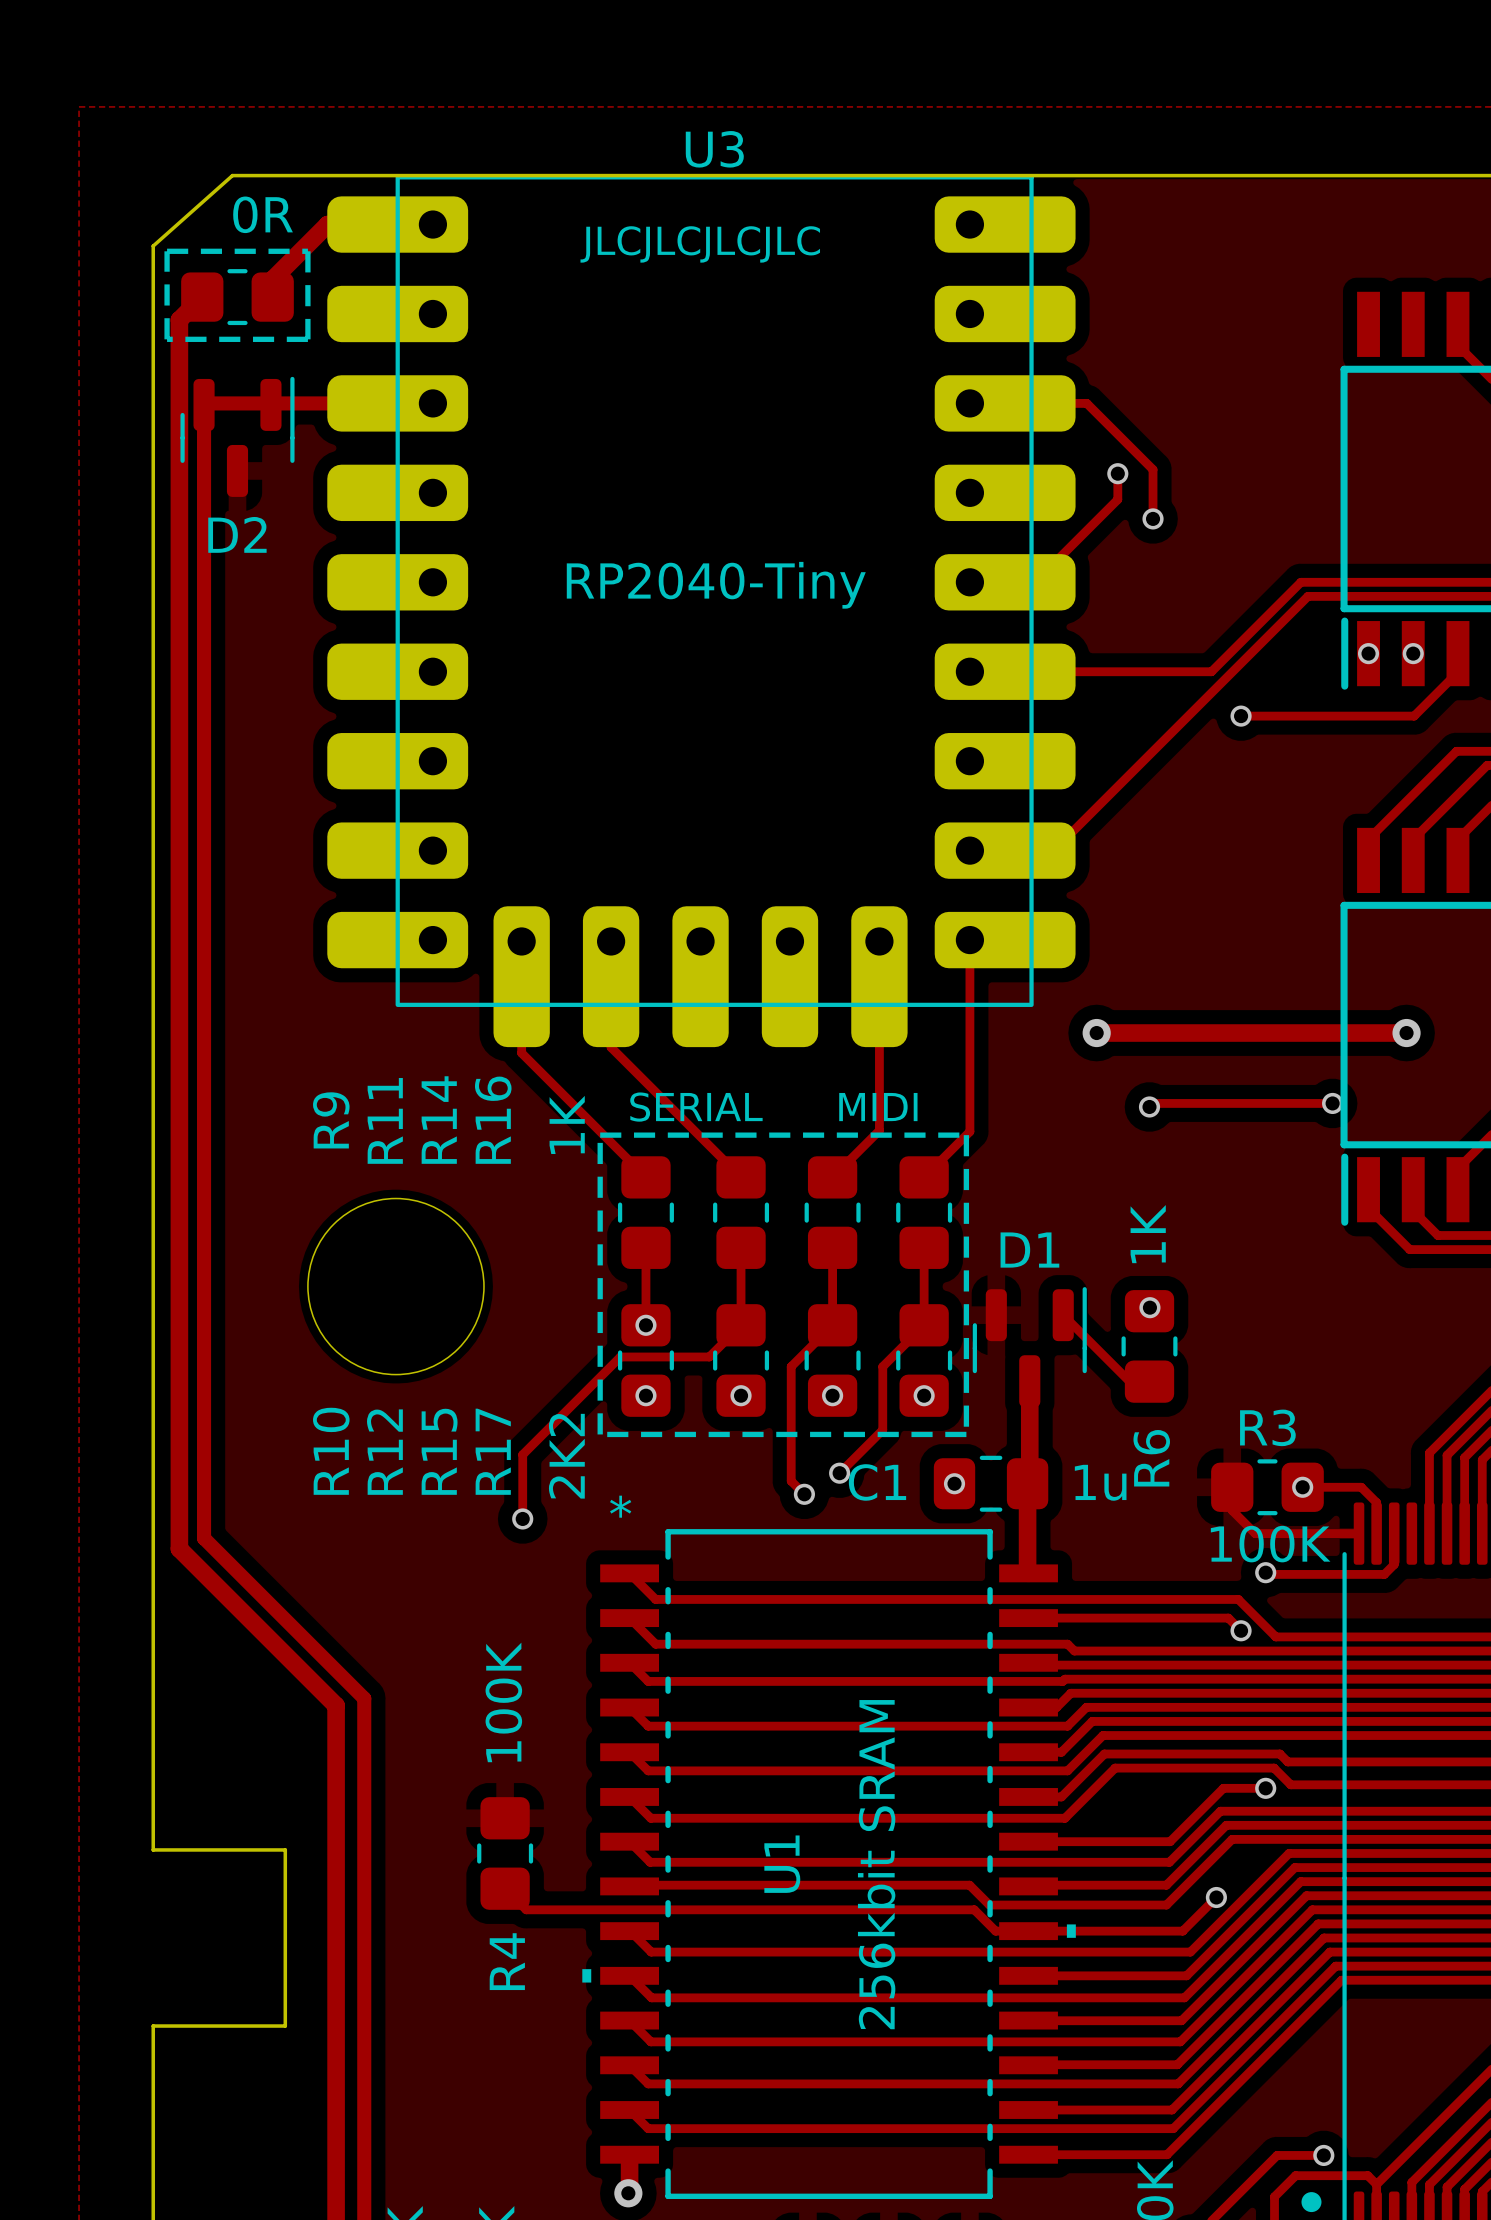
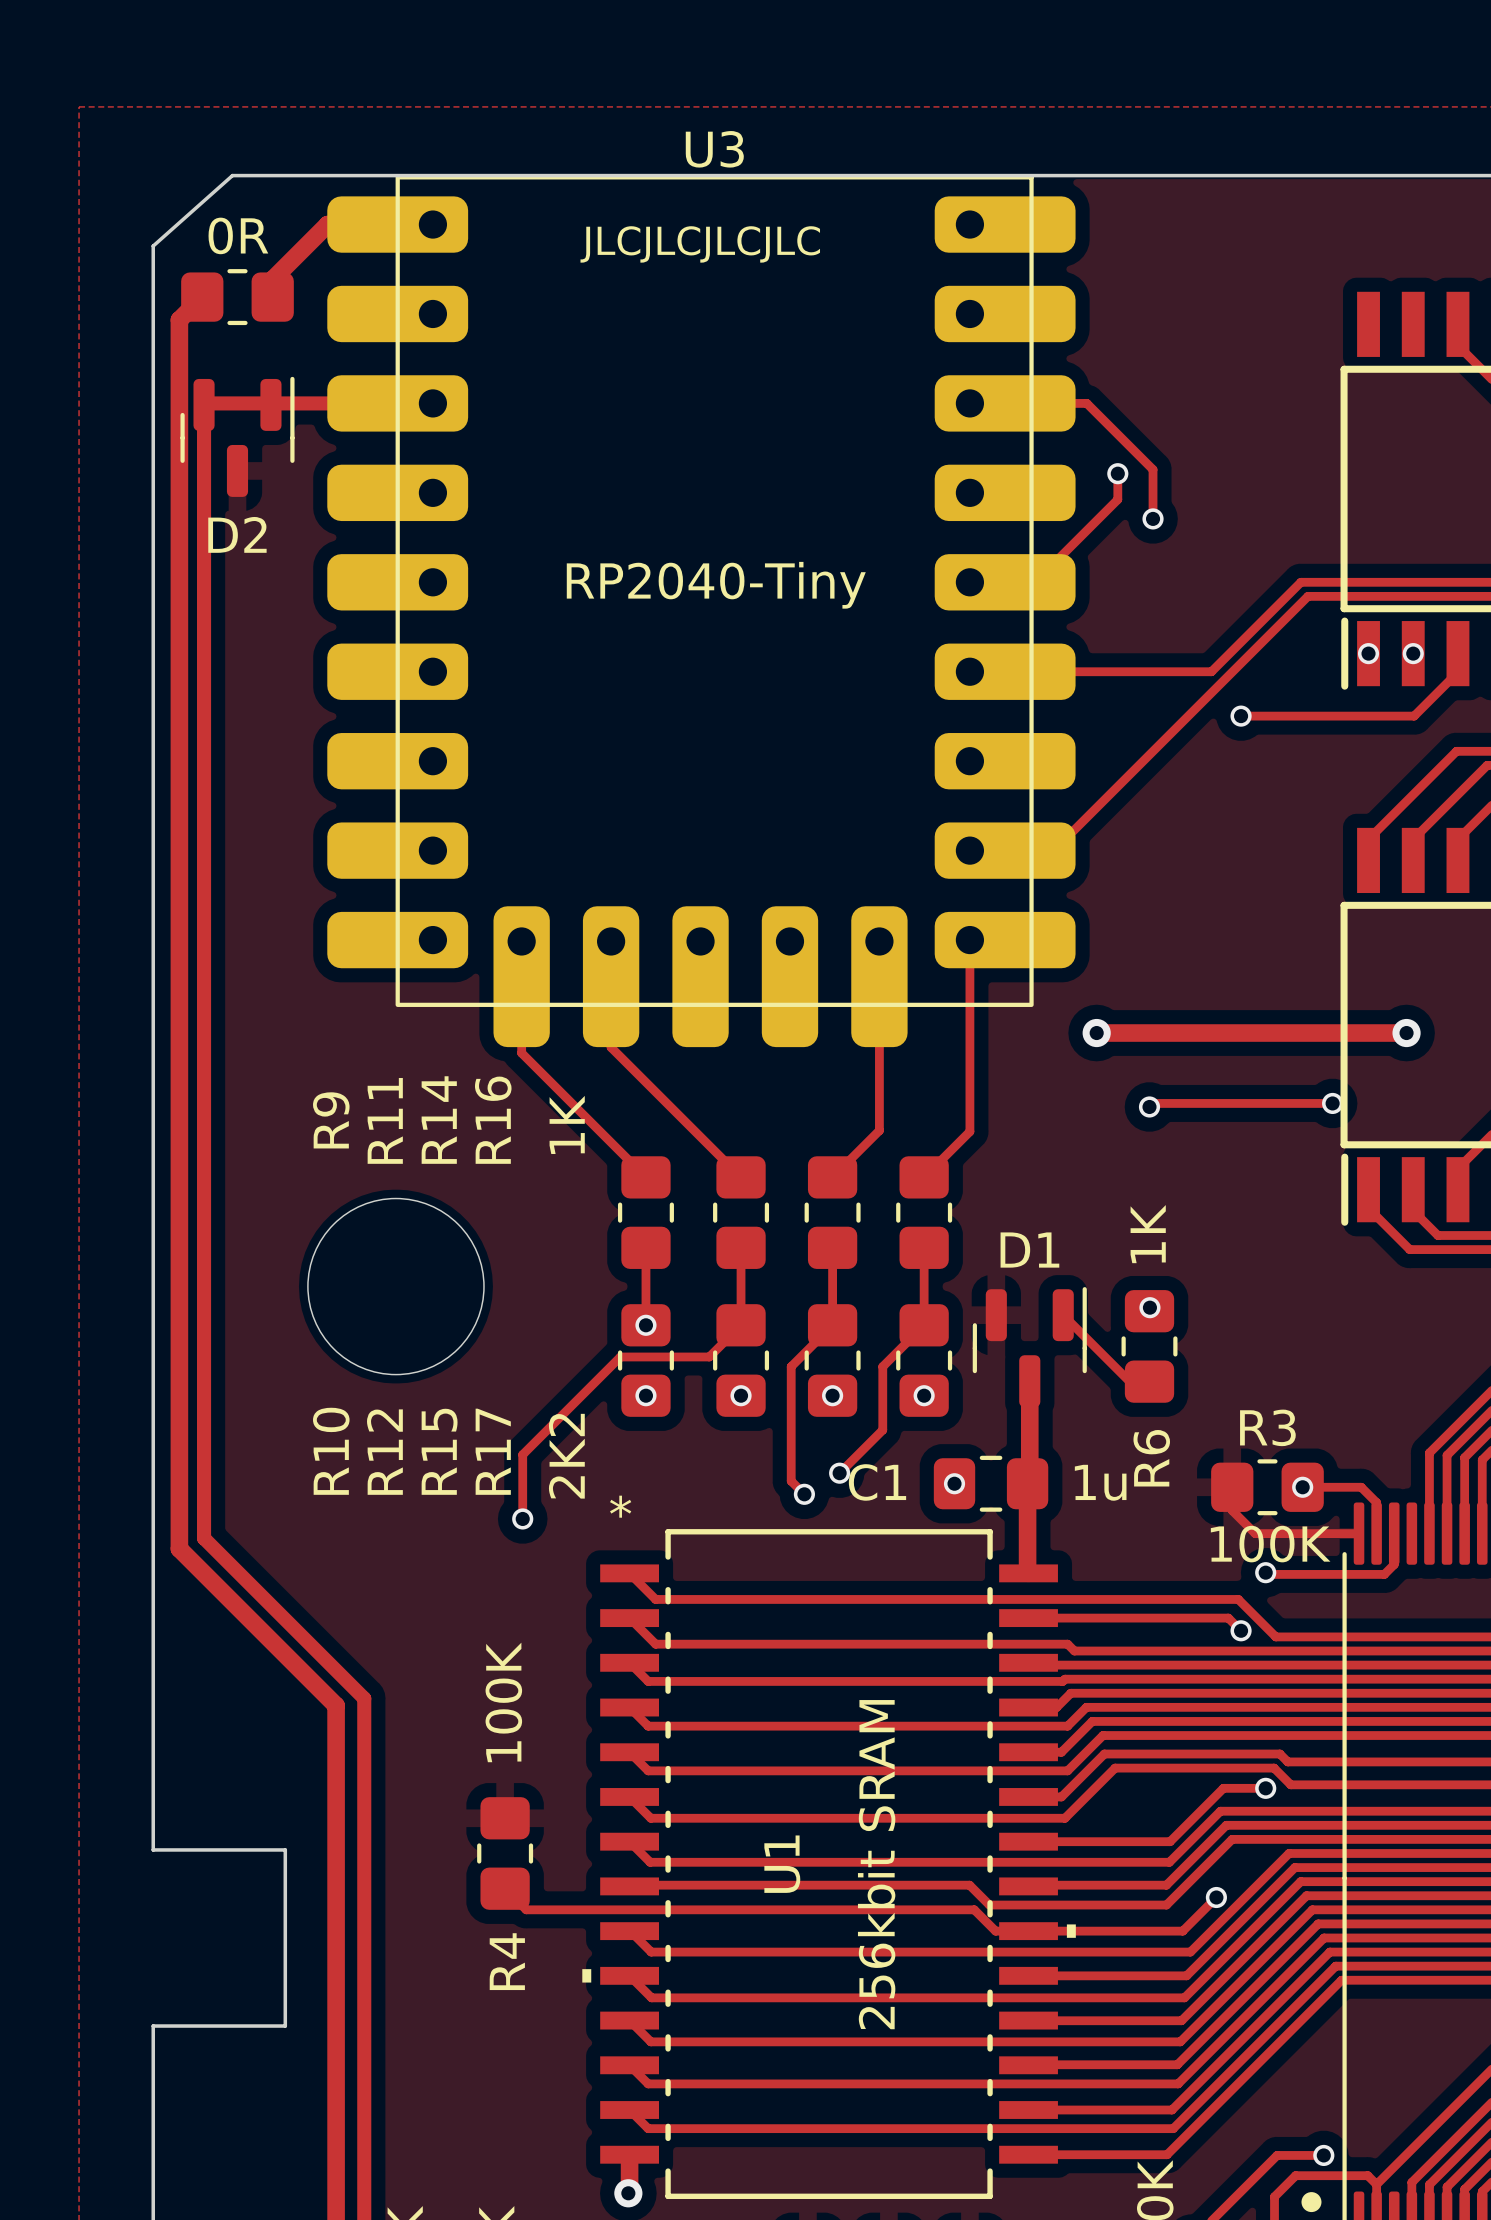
part value position: 0R (263, 214) -> 0R (238, 235)
line: (167, 251) (307, 251) (307, 339) (167, 339) (167, 251) -> none
text: SERIAL (696, 1107) -> none
text: MIDI (878, 1107) -> none
line: (600, 1135) (966, 1135) (966, 1434) (600, 1434) (600, 1135) -> none

